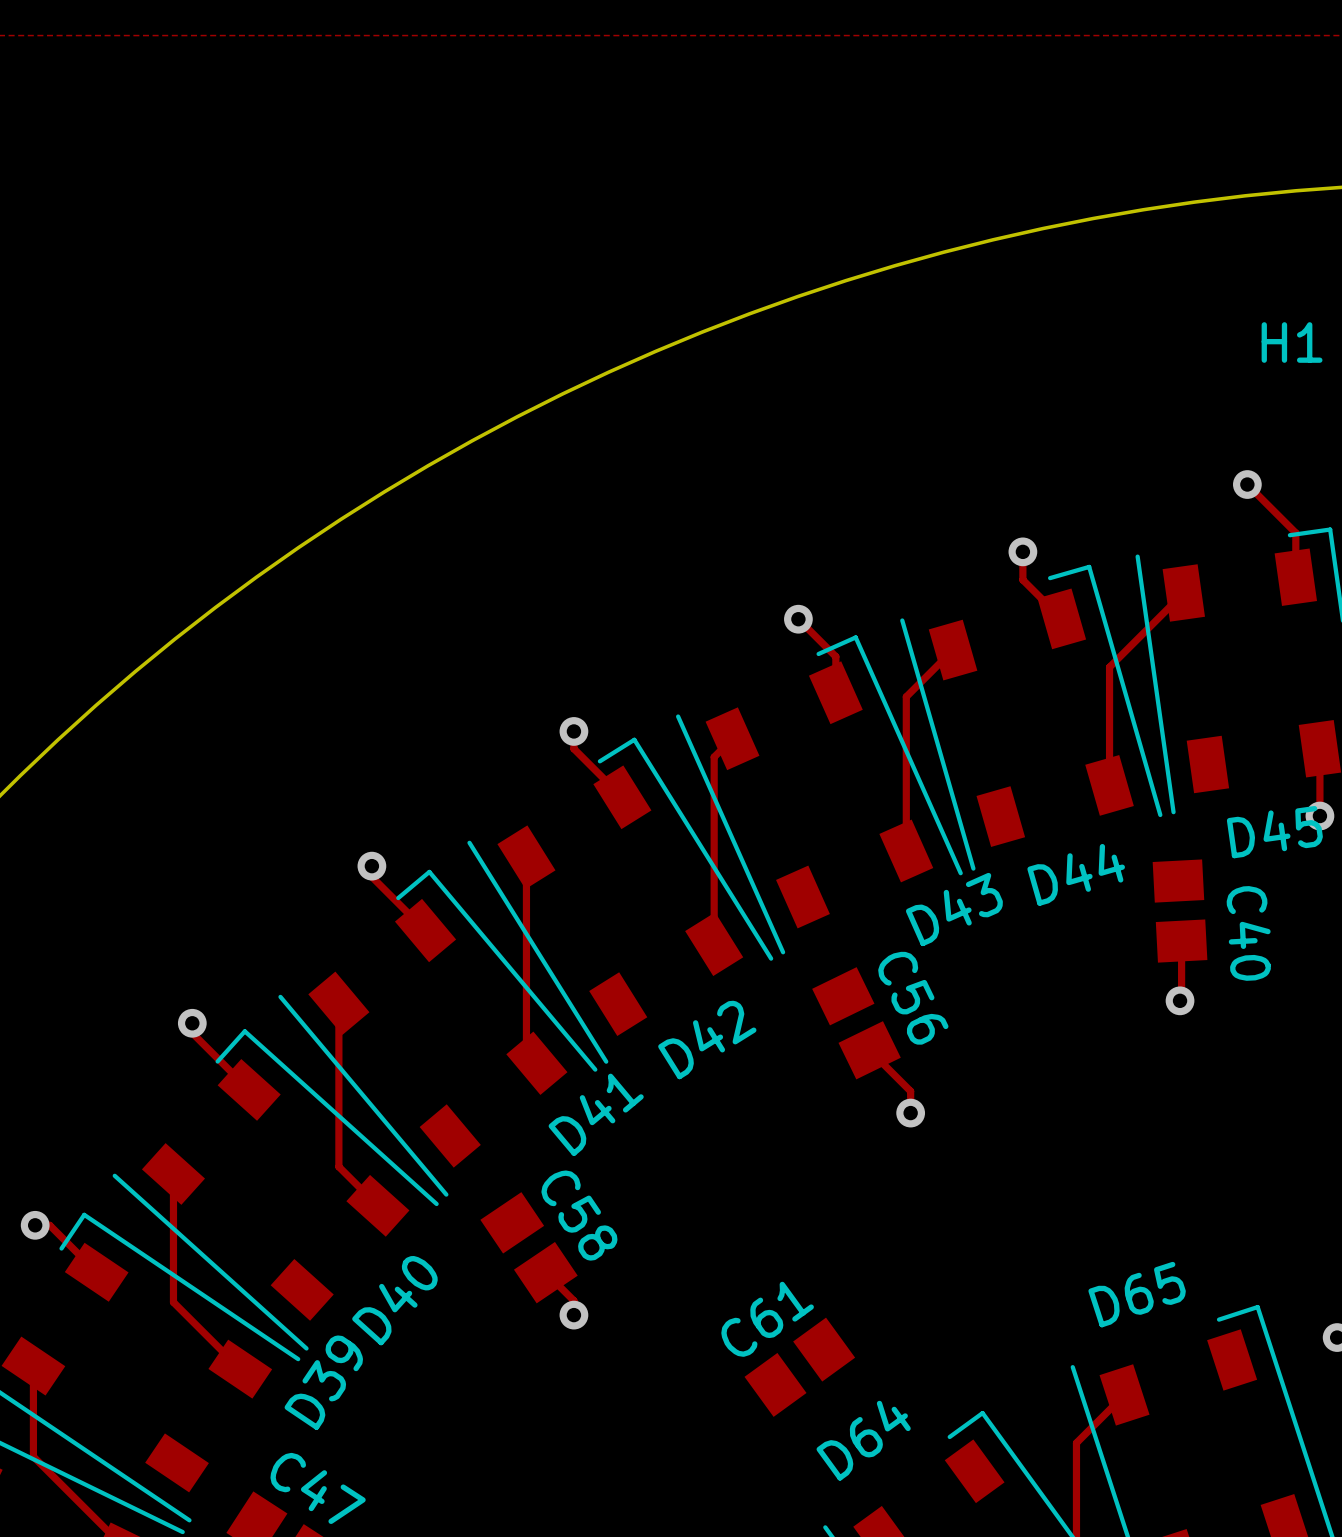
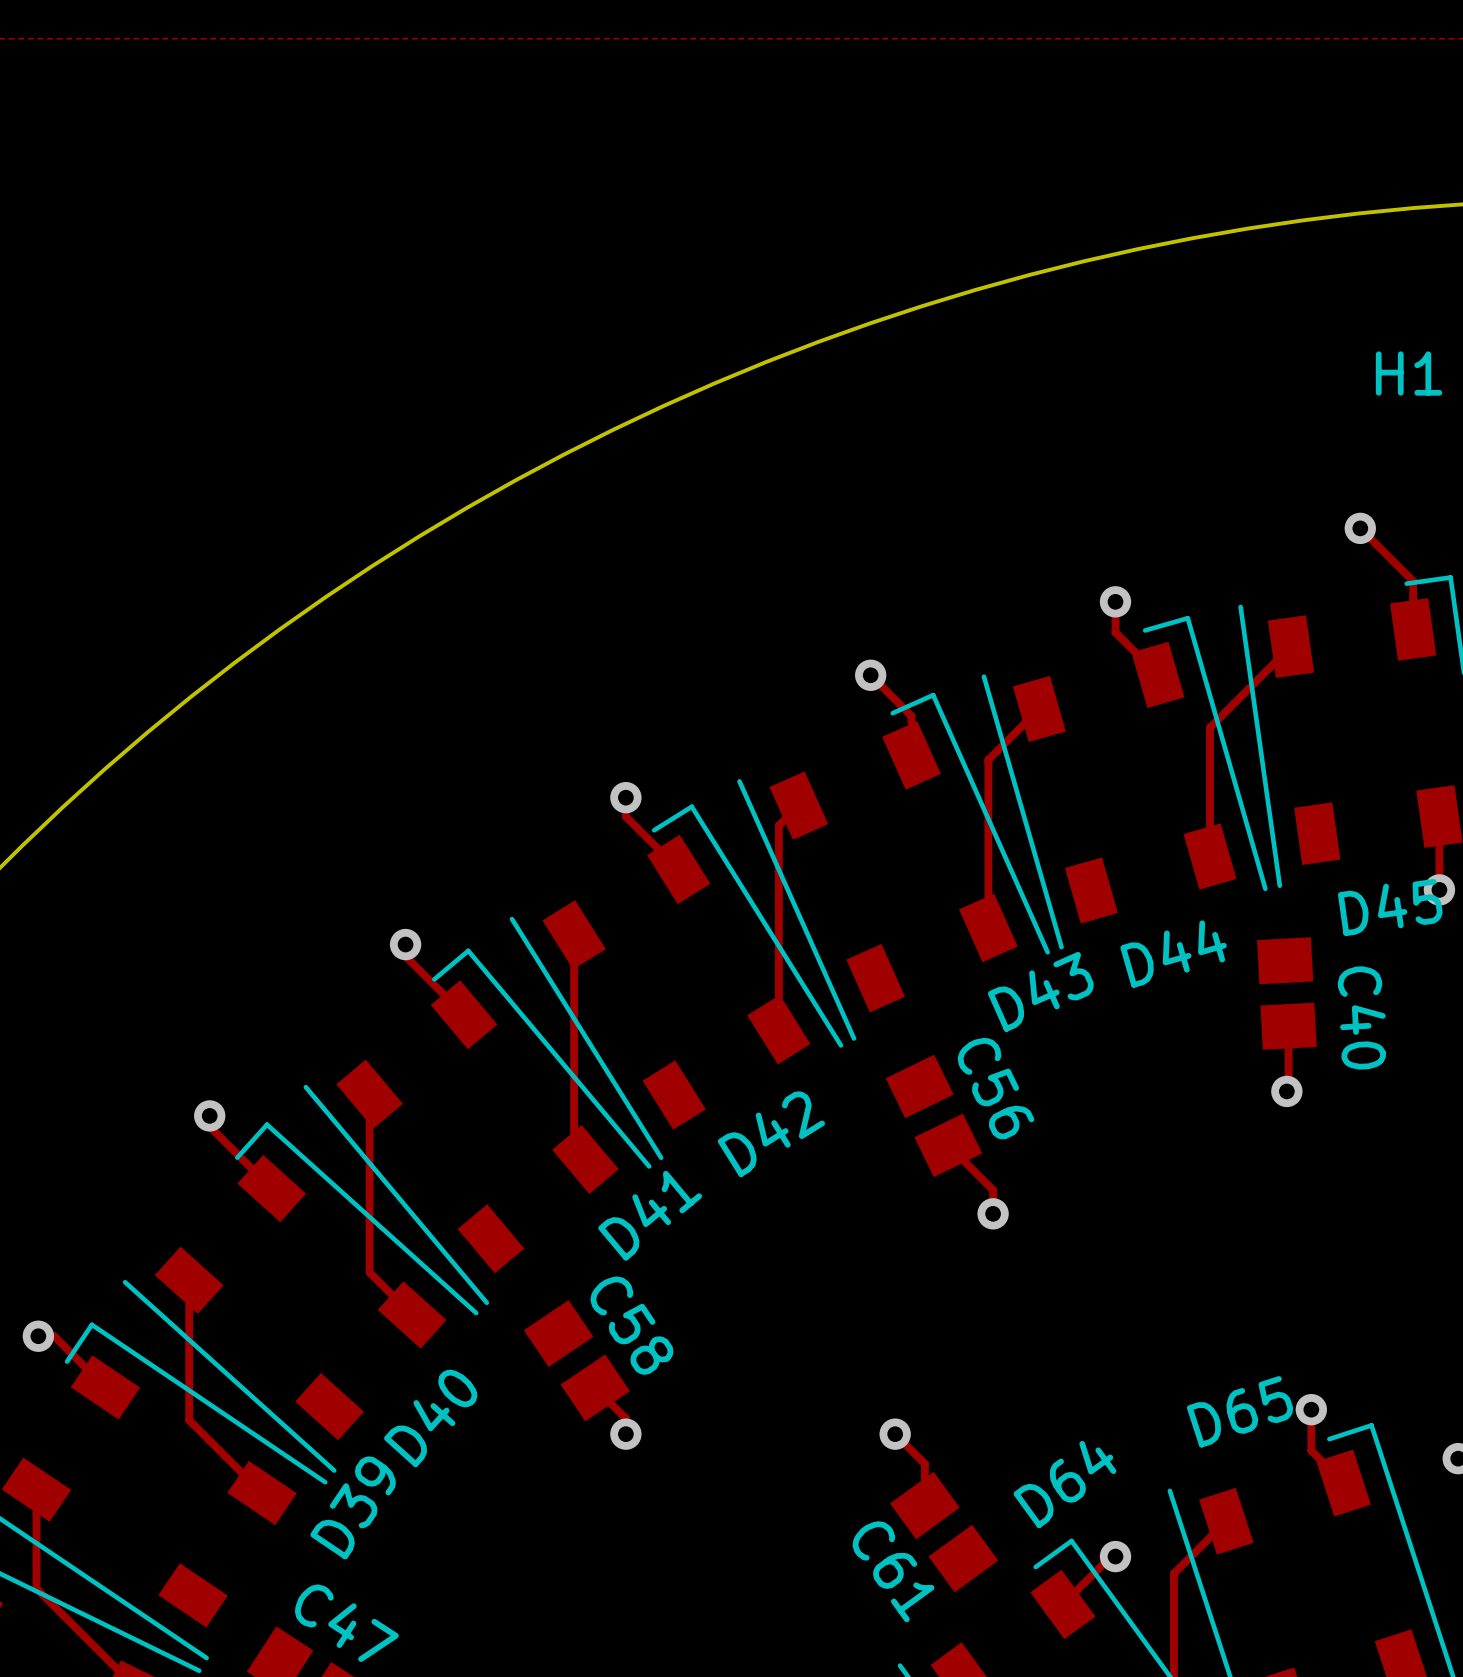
track: none -> (1311, 1409) (1311, 1450) (1343, 1483)
via: none -> (1311, 1409)
track: none -> (895, 1434) (924, 1463) (924, 1505)
via: none -> (895, 1434)
C61 name position: C61 (767, 1319) -> C61 (893, 1571)
C61 rotation: 0° (799, 1367) -> 90° clockwise (944, 1532)
C61 position: (799, 1367) -> (944, 1532)
track: none -> (1115, 1556) (1110, 1556) (1062, 1604)
via: none -> (1115, 1556)
D64 name position: D64 (863, 1440) -> D64 (1064, 1484)

